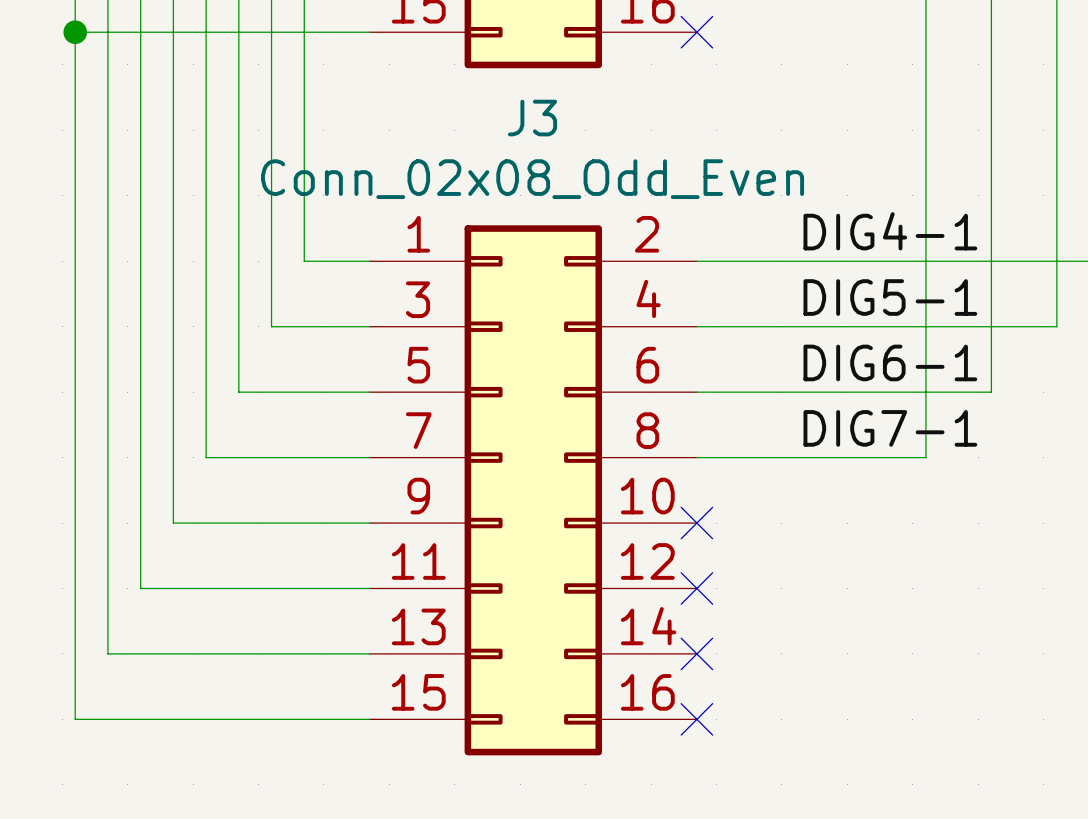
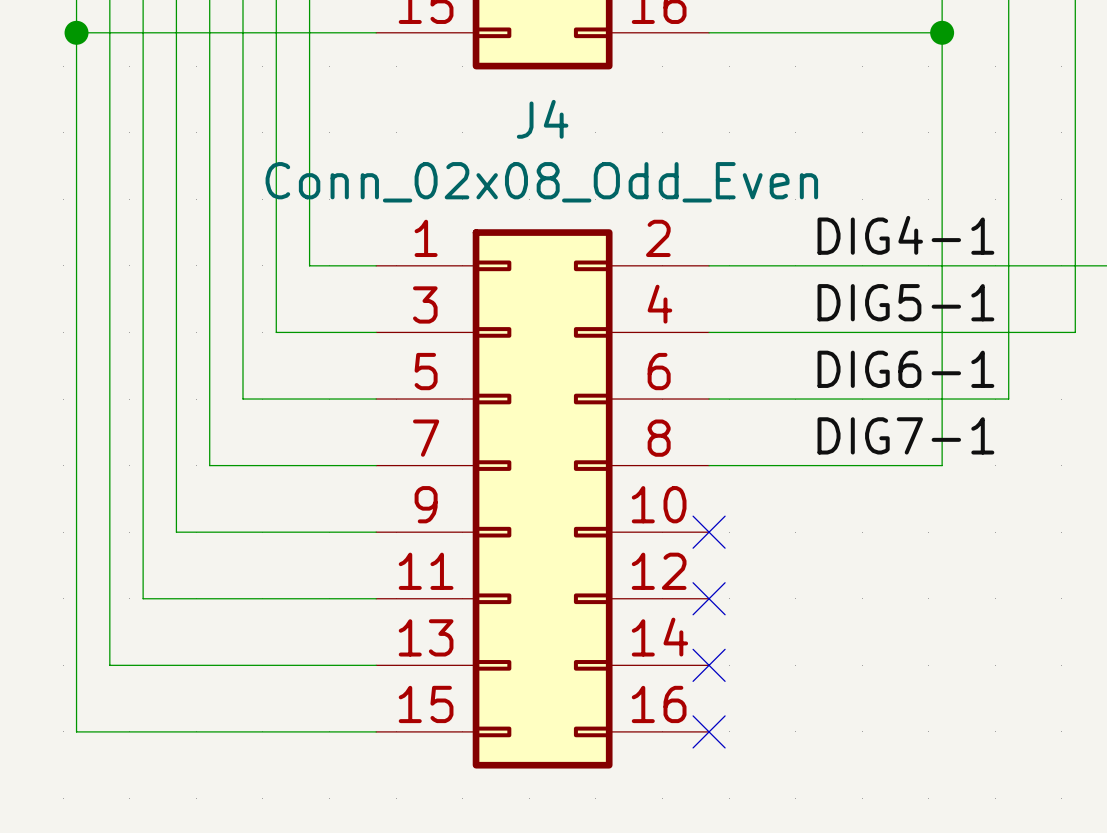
wire: none -> (709, 32) (942, 32)
no-connect mark: (696, 32) -> none
junction: none -> (942, 32)
J3 name: J3 (532, 118) -> J4 (542, 119)

